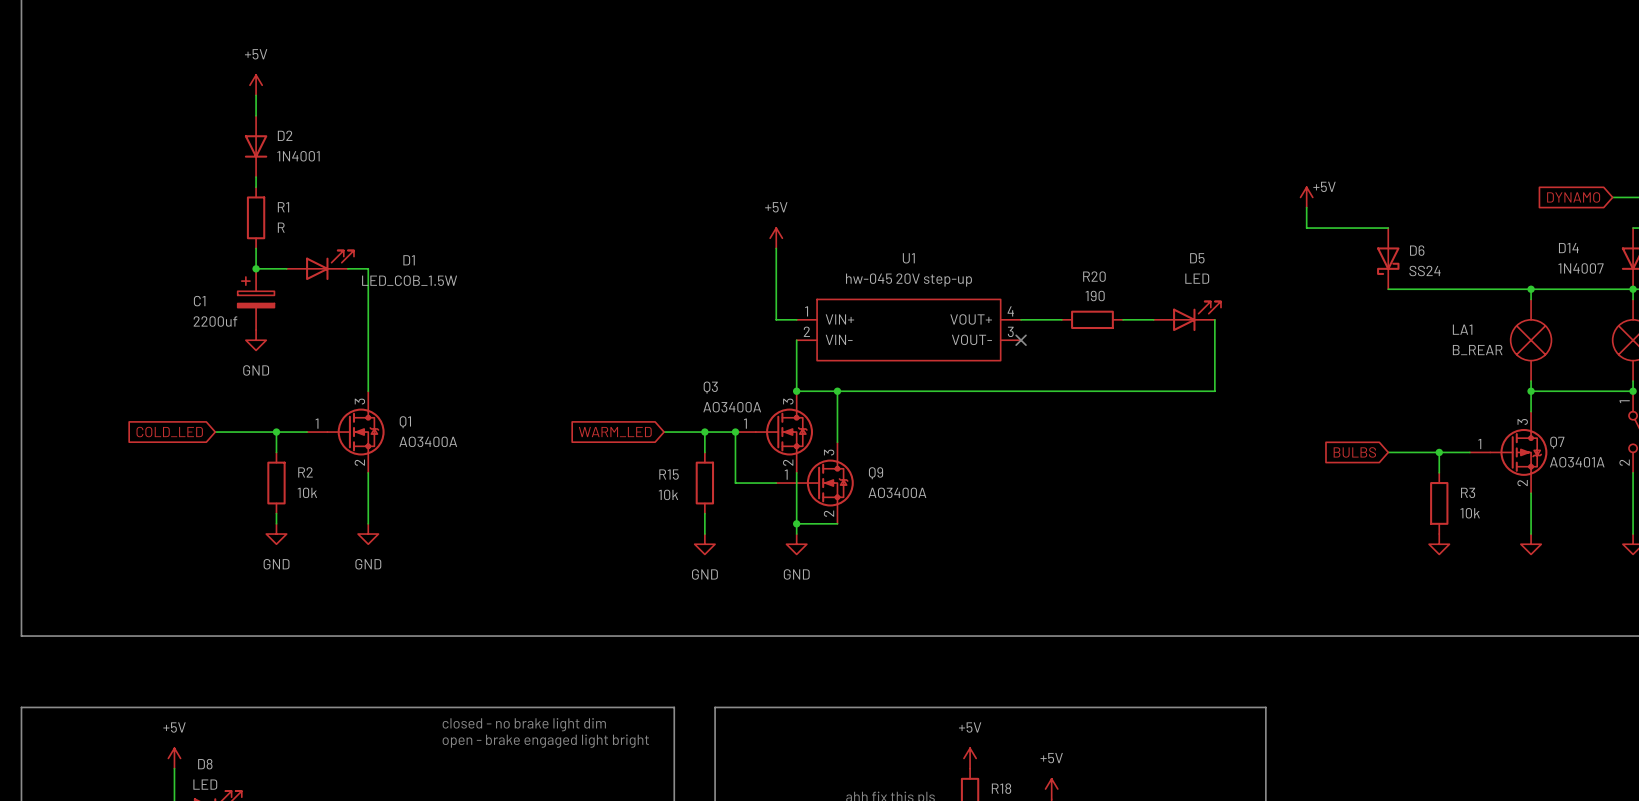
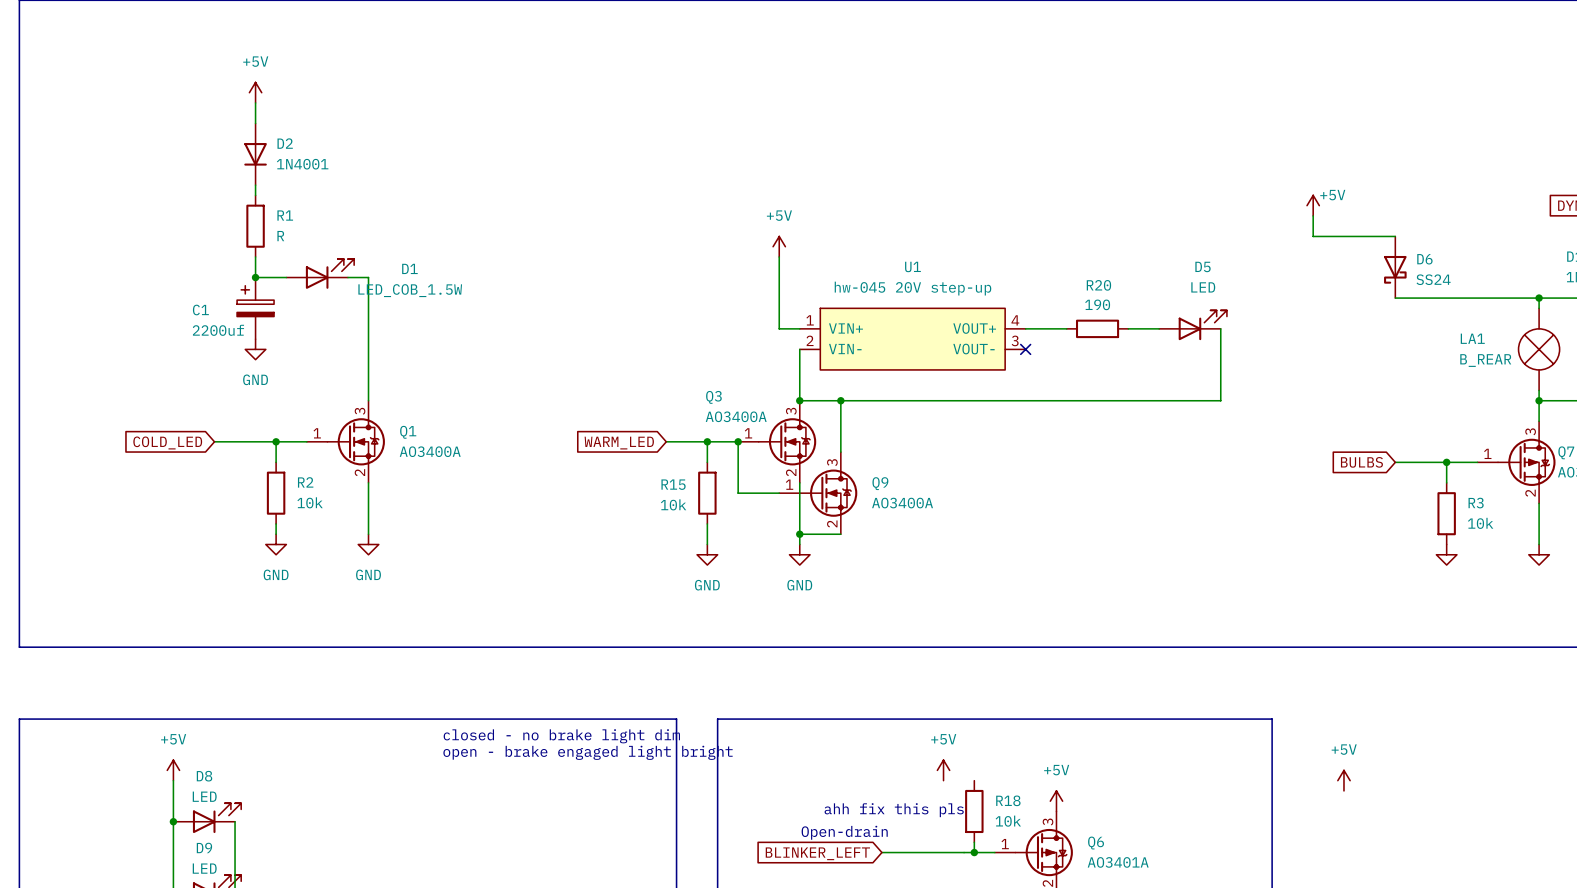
power symbol position: +5V (970, 758) -> +5V (943, 770)
power symbol: none -> +5V (1343, 780)

